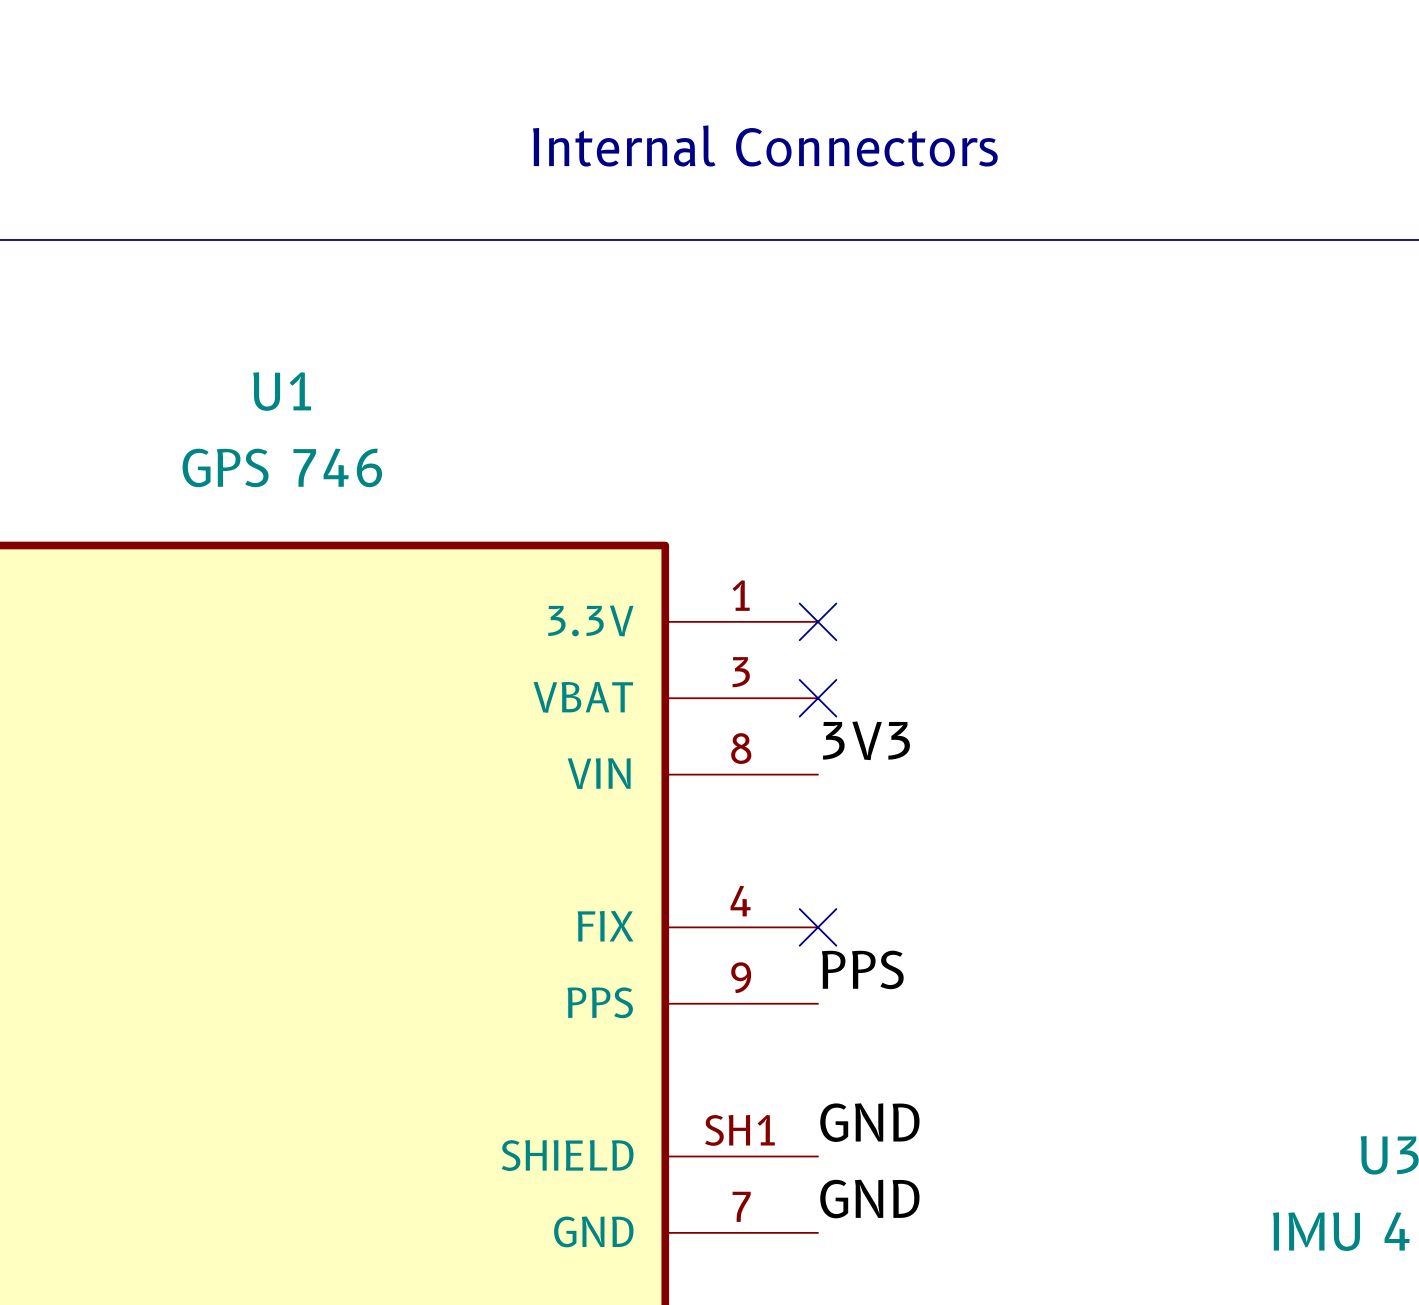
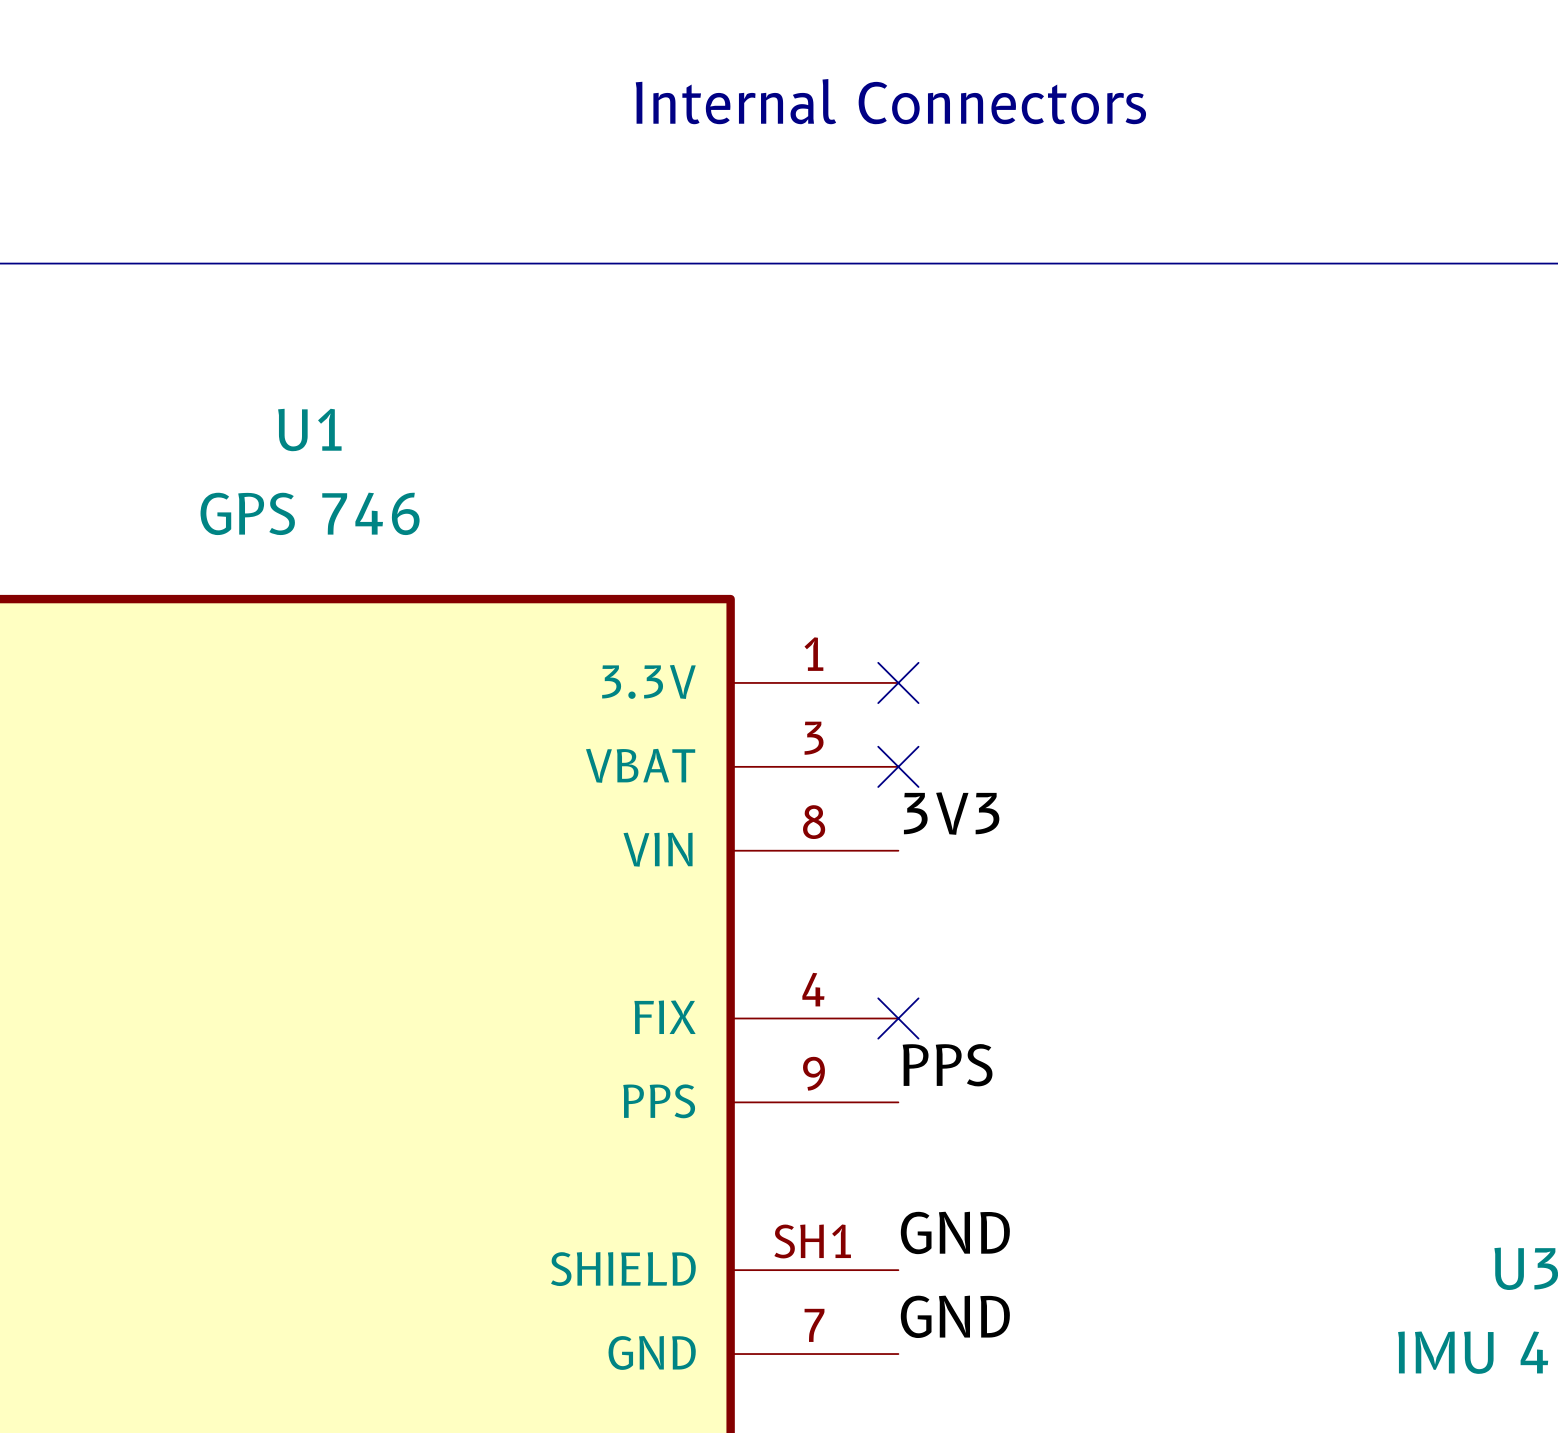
text position: Internal Connectors (765, 145) -> Internal Connectors (890, 101)

